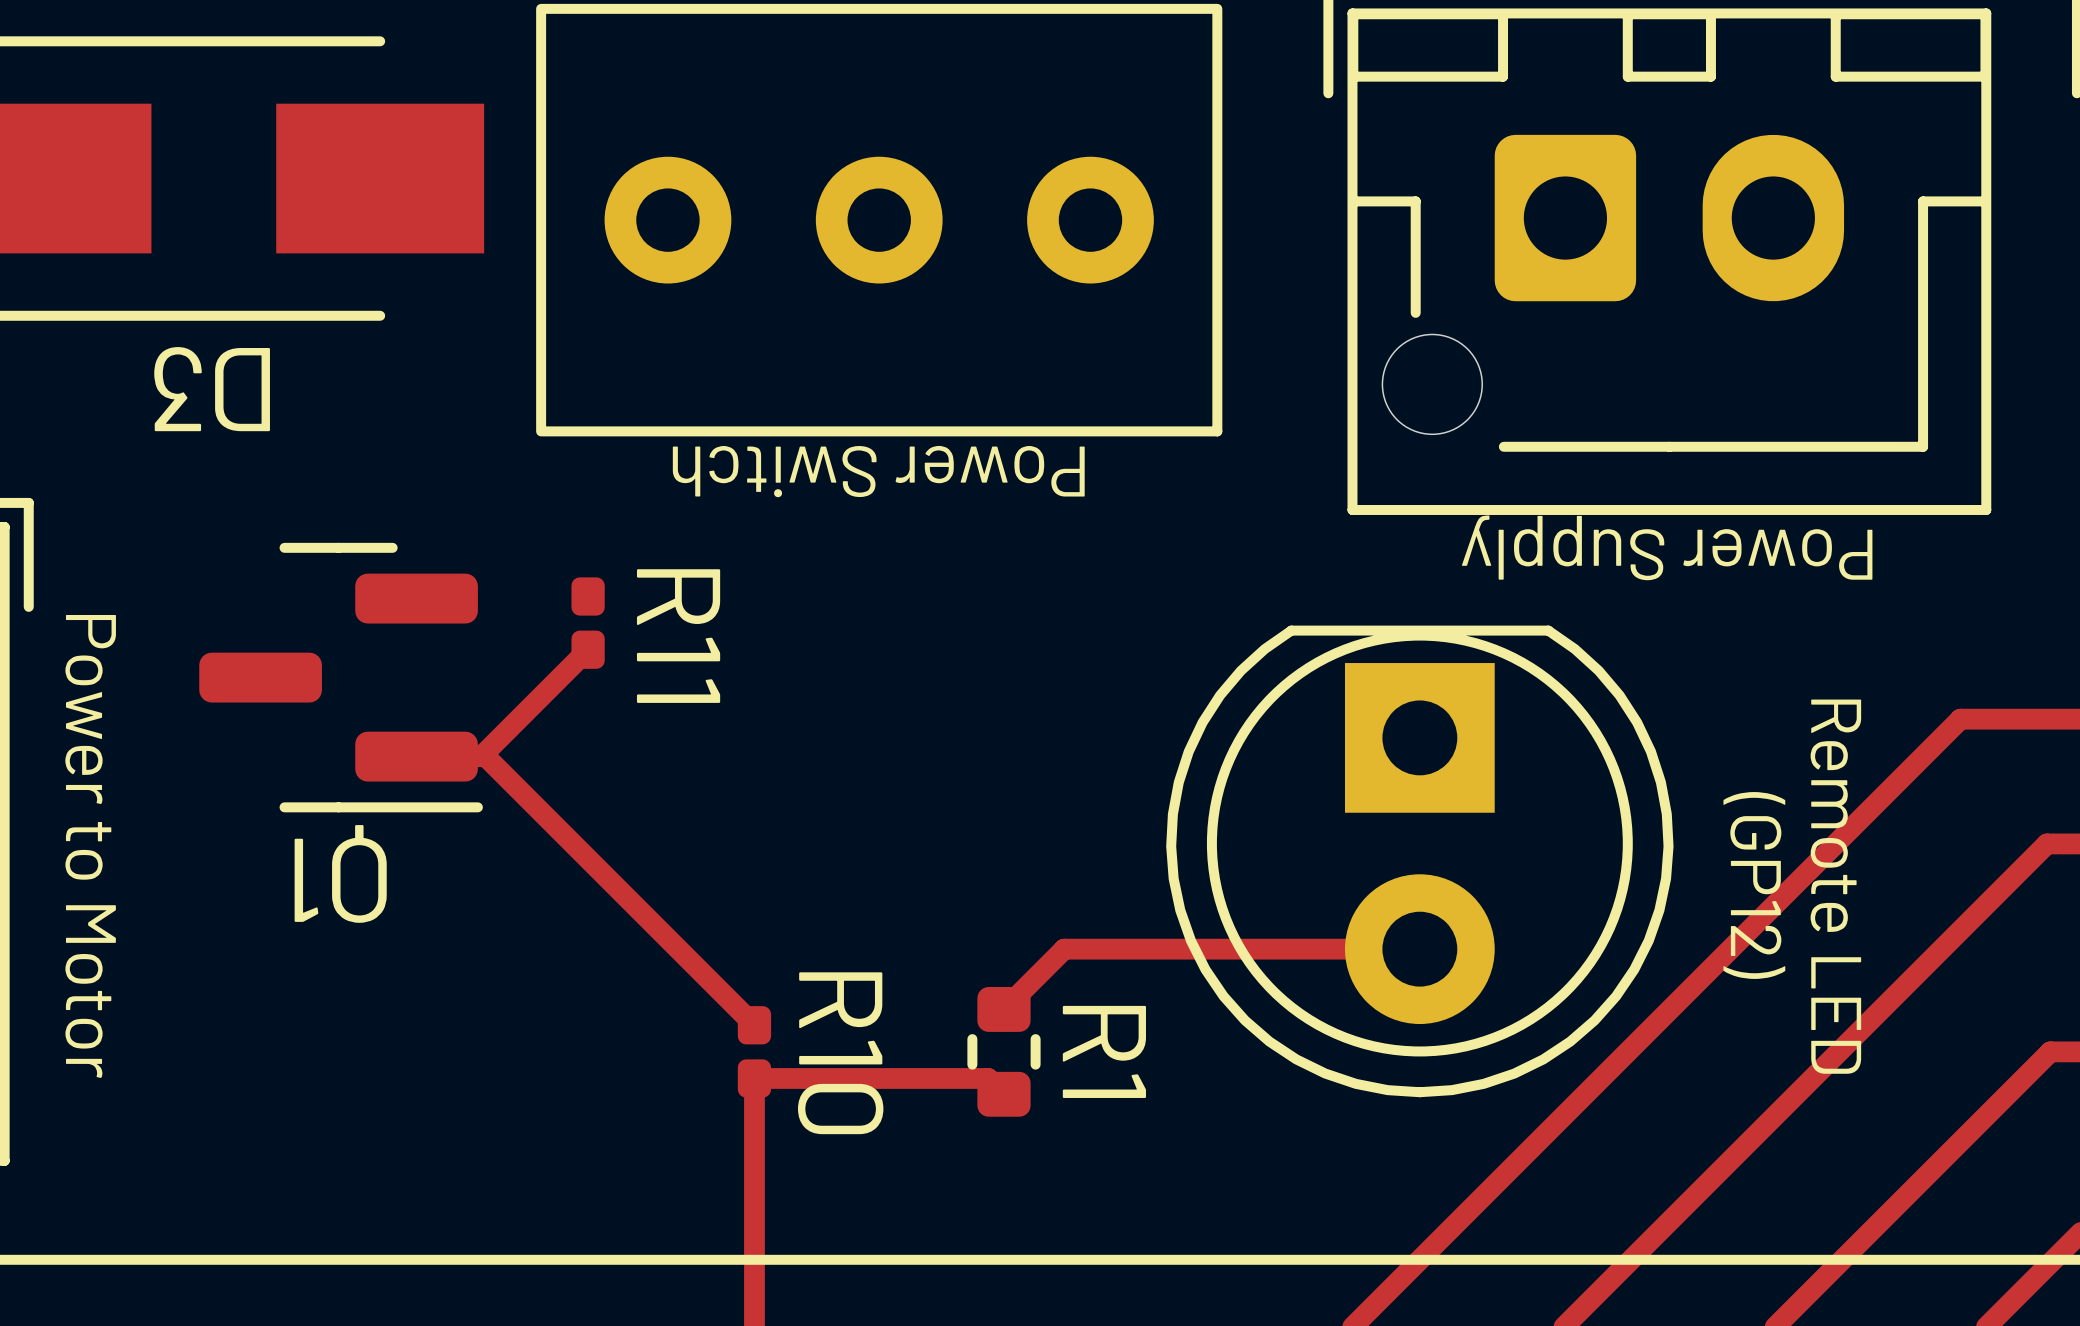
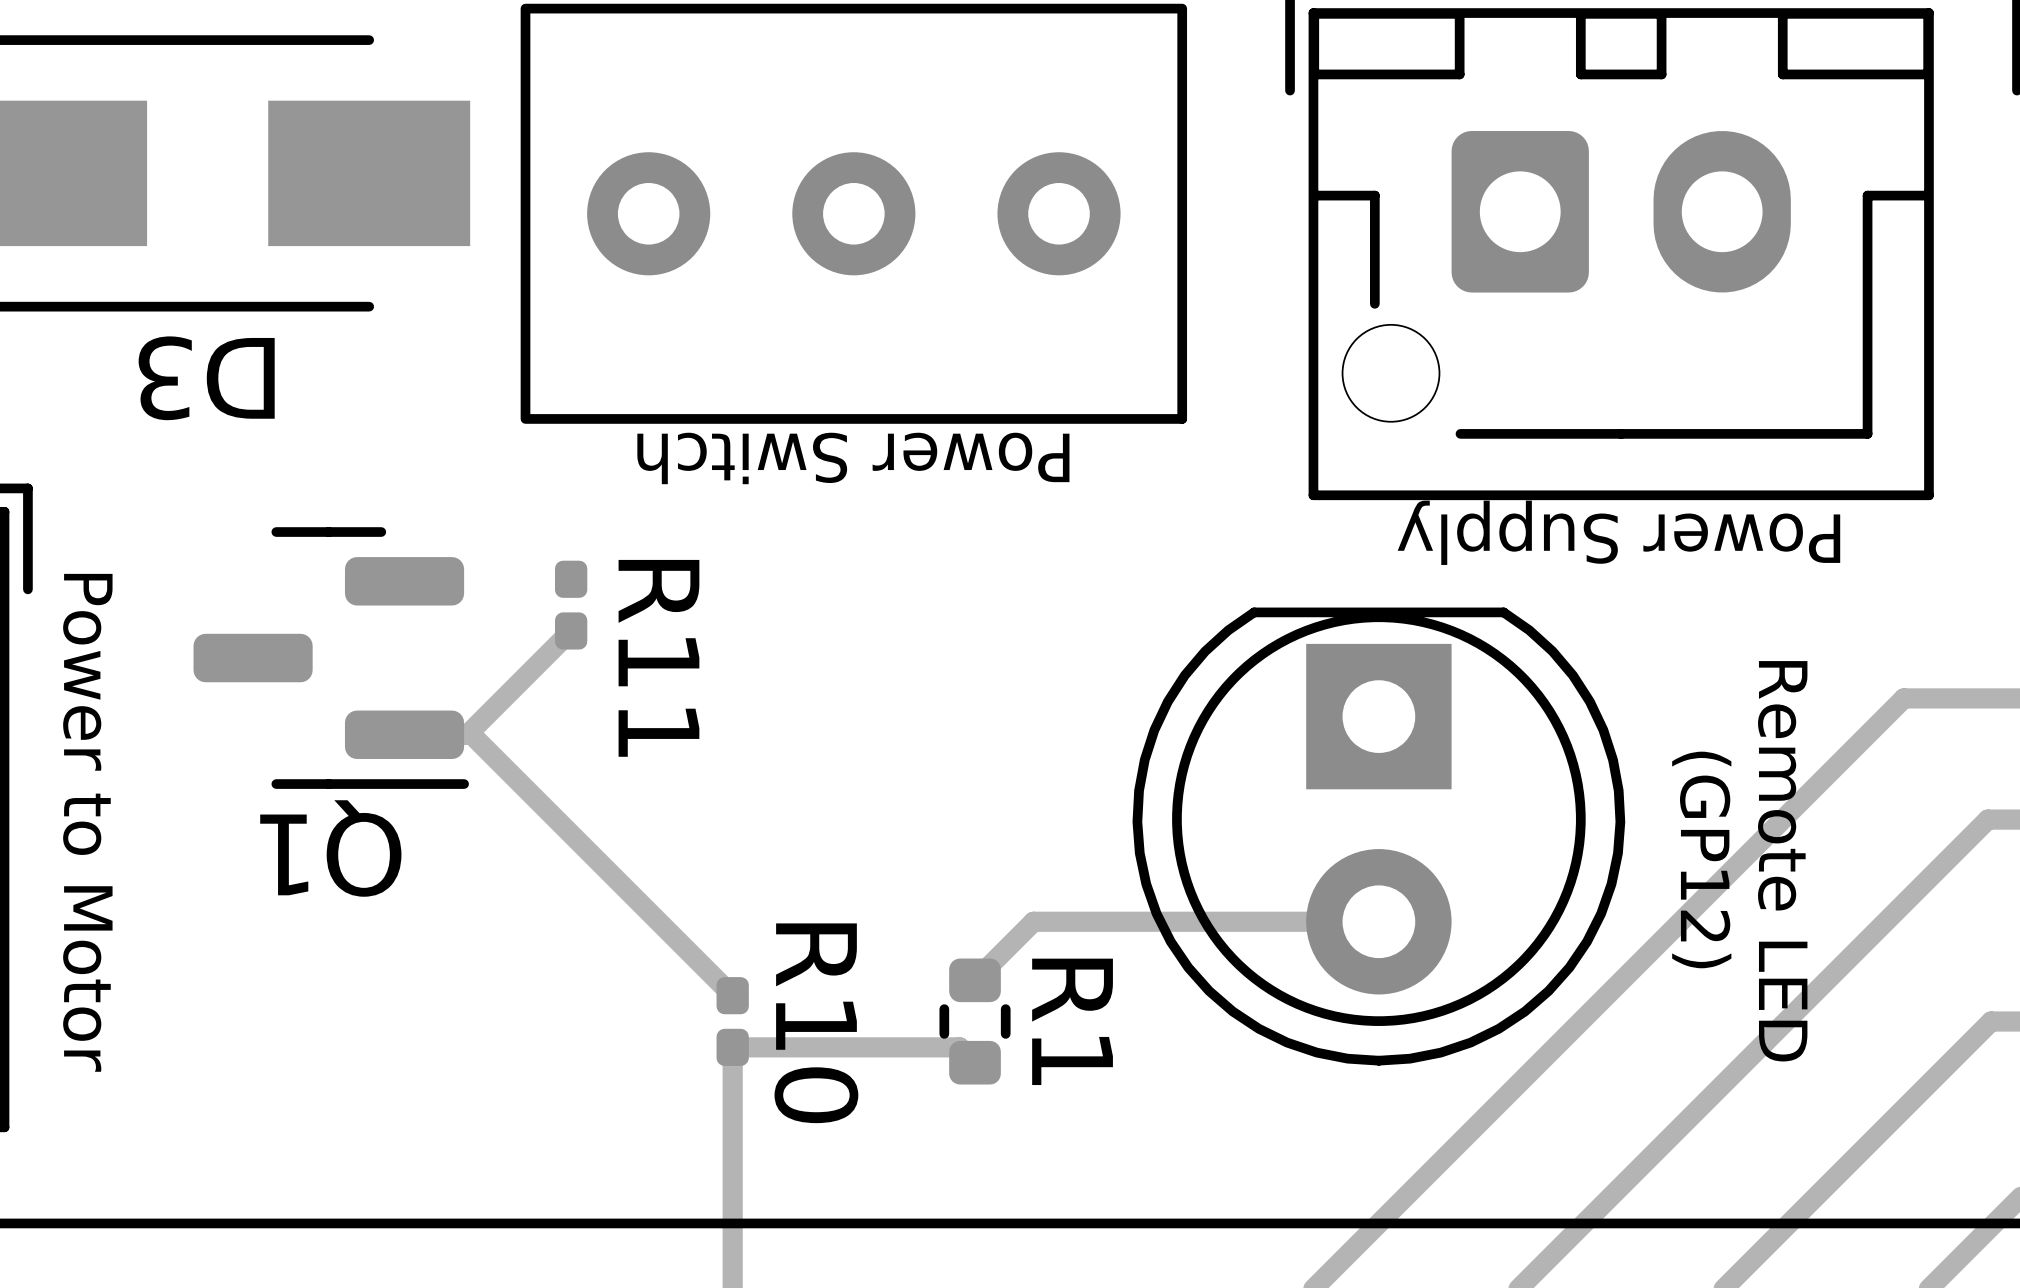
R11 name position: R11 (678, 636) -> R11 (658, 658)

